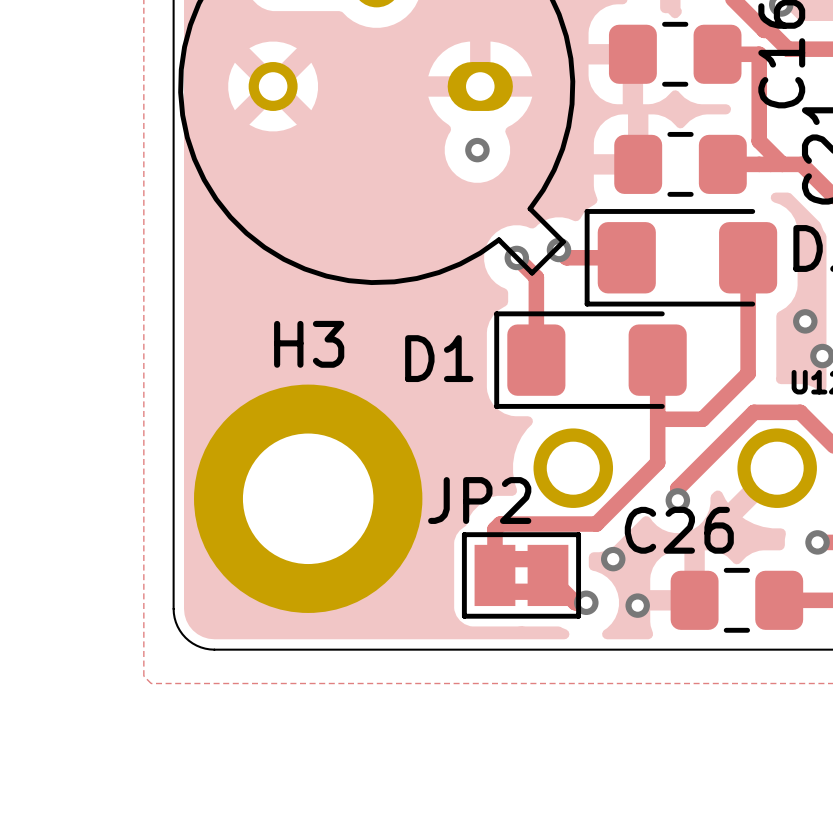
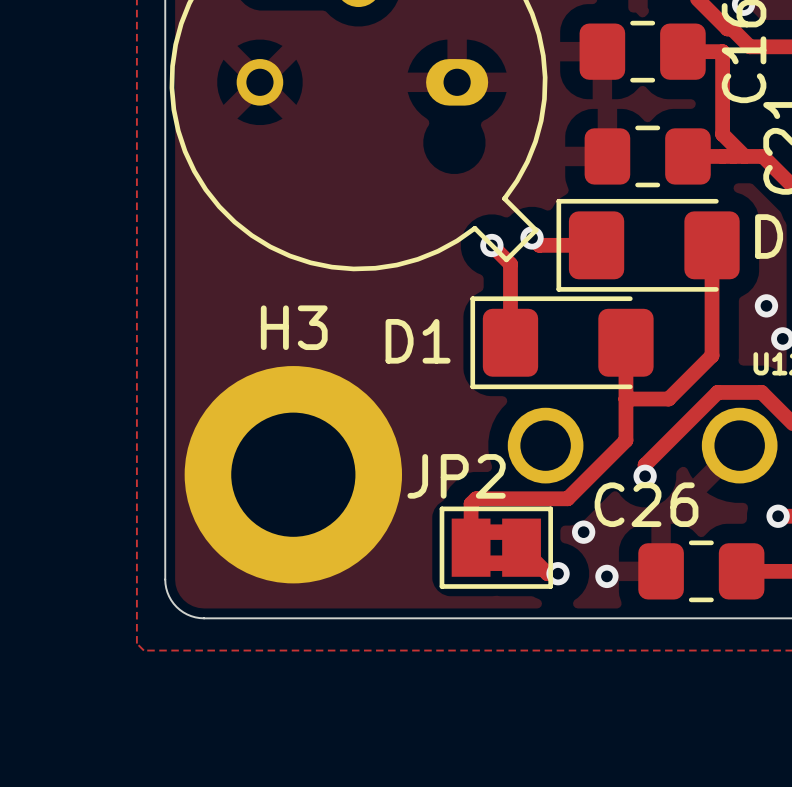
via: (477, 150) -> none

